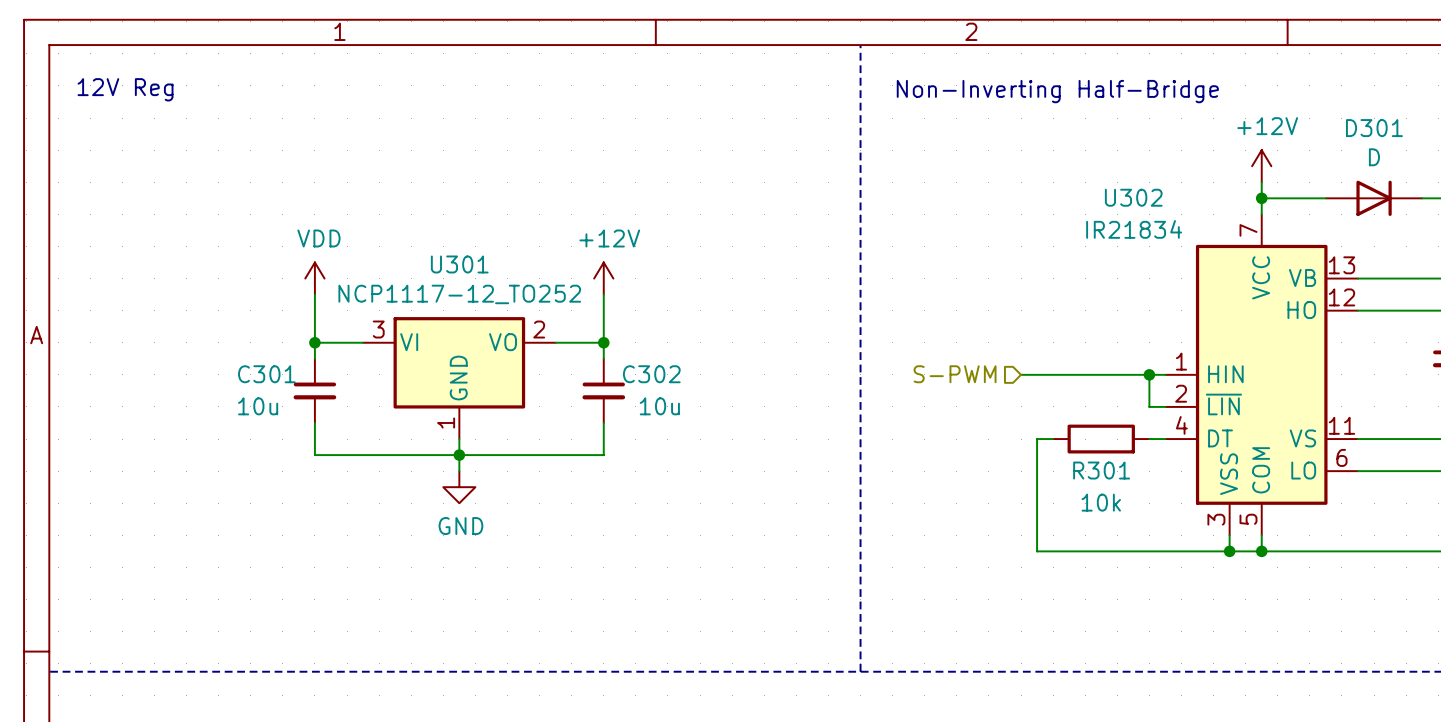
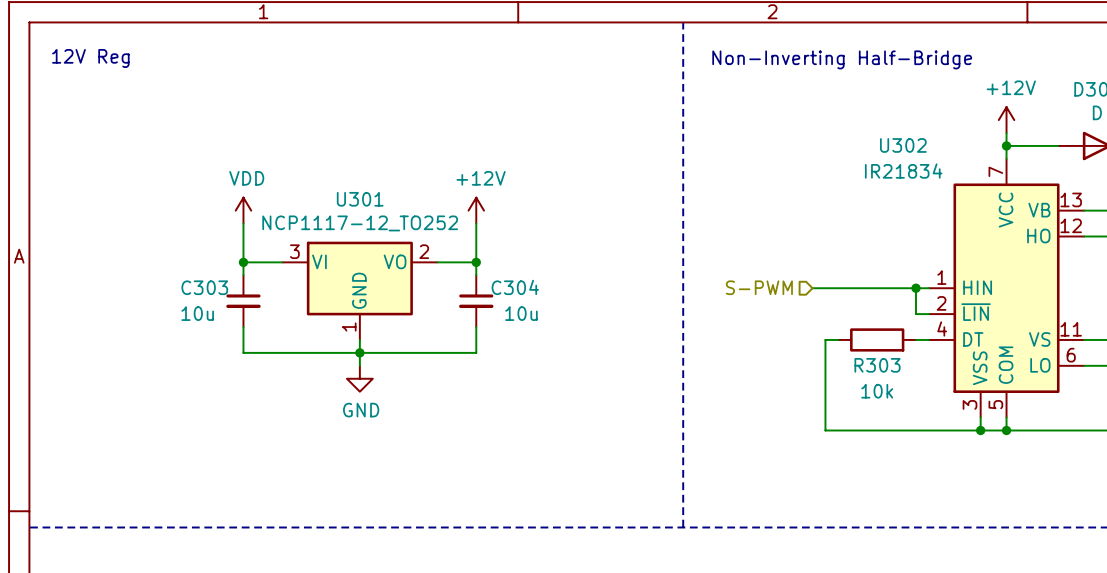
C301 name: C301 (266, 374) -> C303 (204, 287)
C302 name: C302 (651, 374) -> C304 (515, 287)
R301 name: R301 (1101, 470) -> R303 (877, 365)

